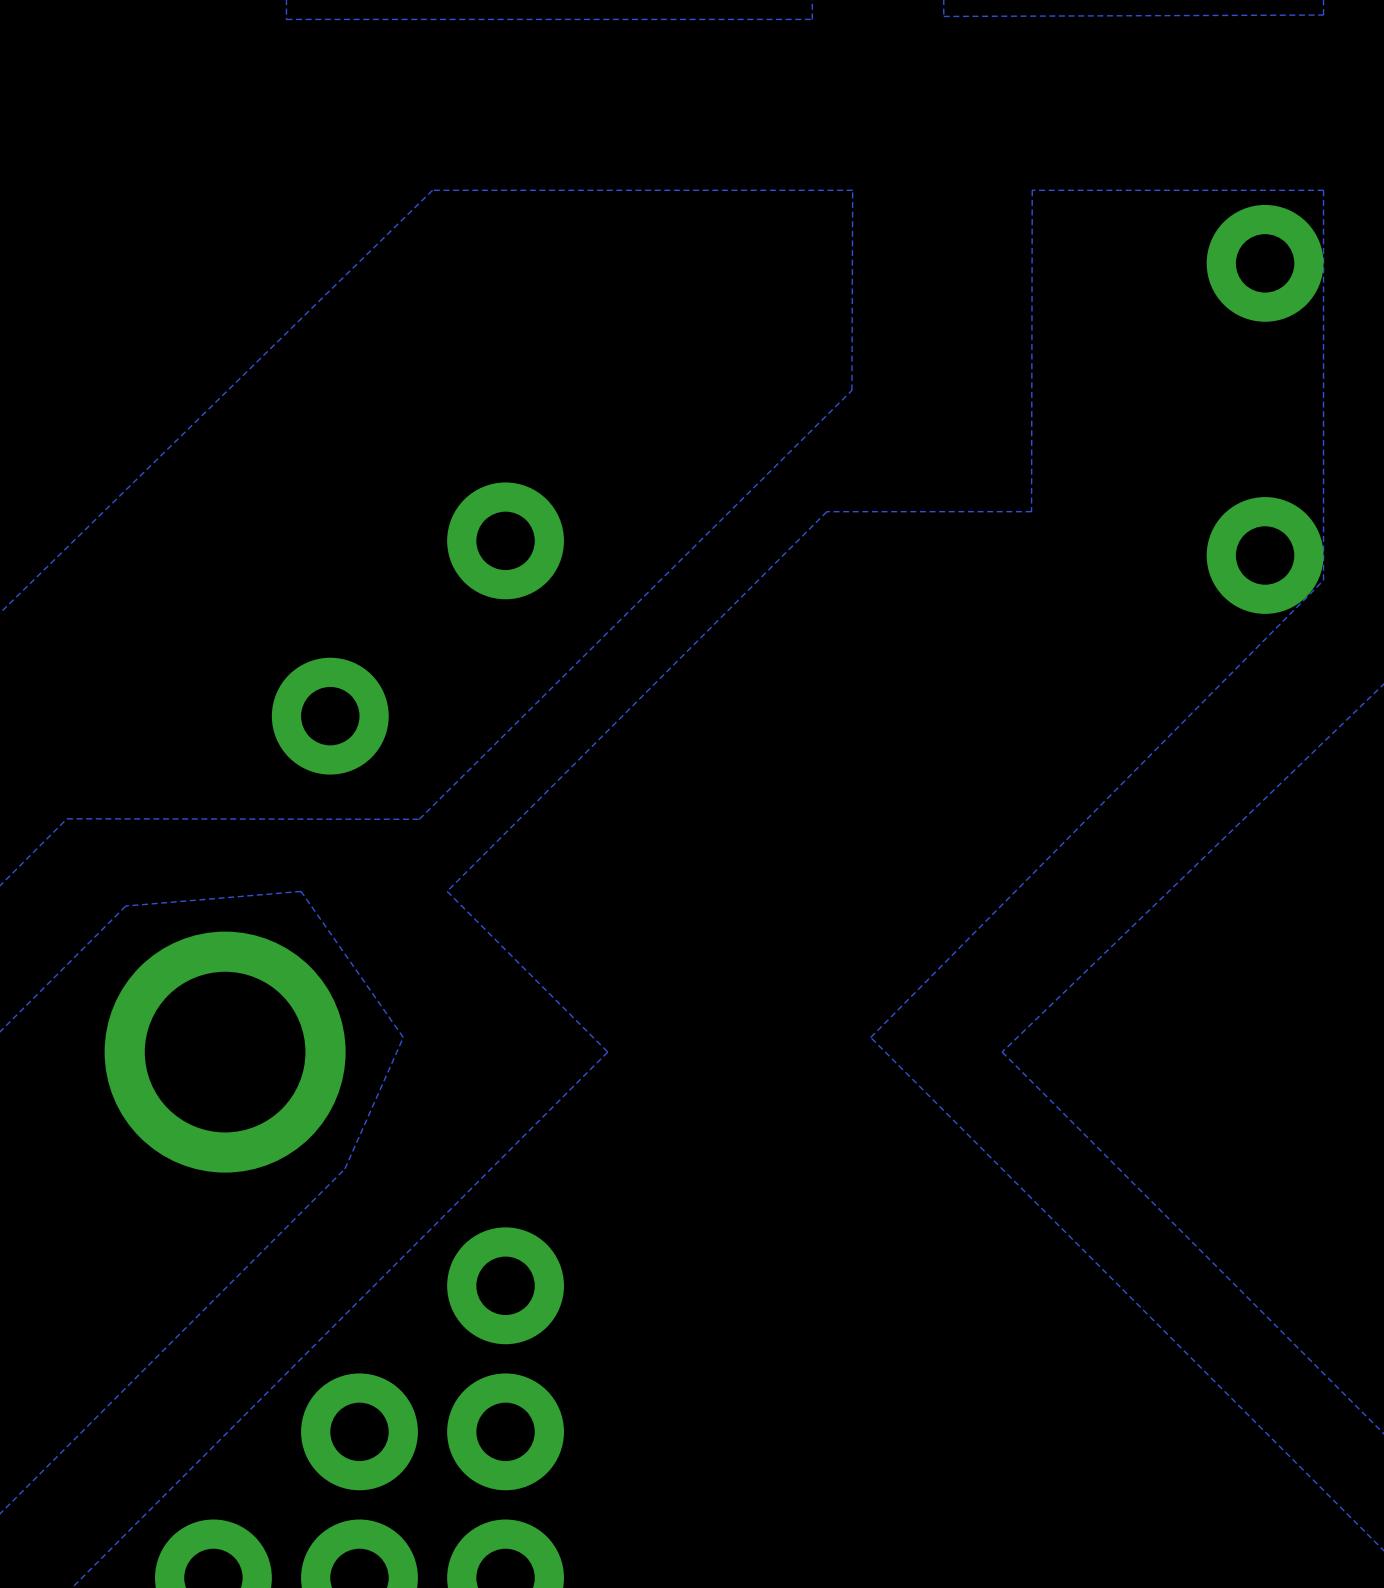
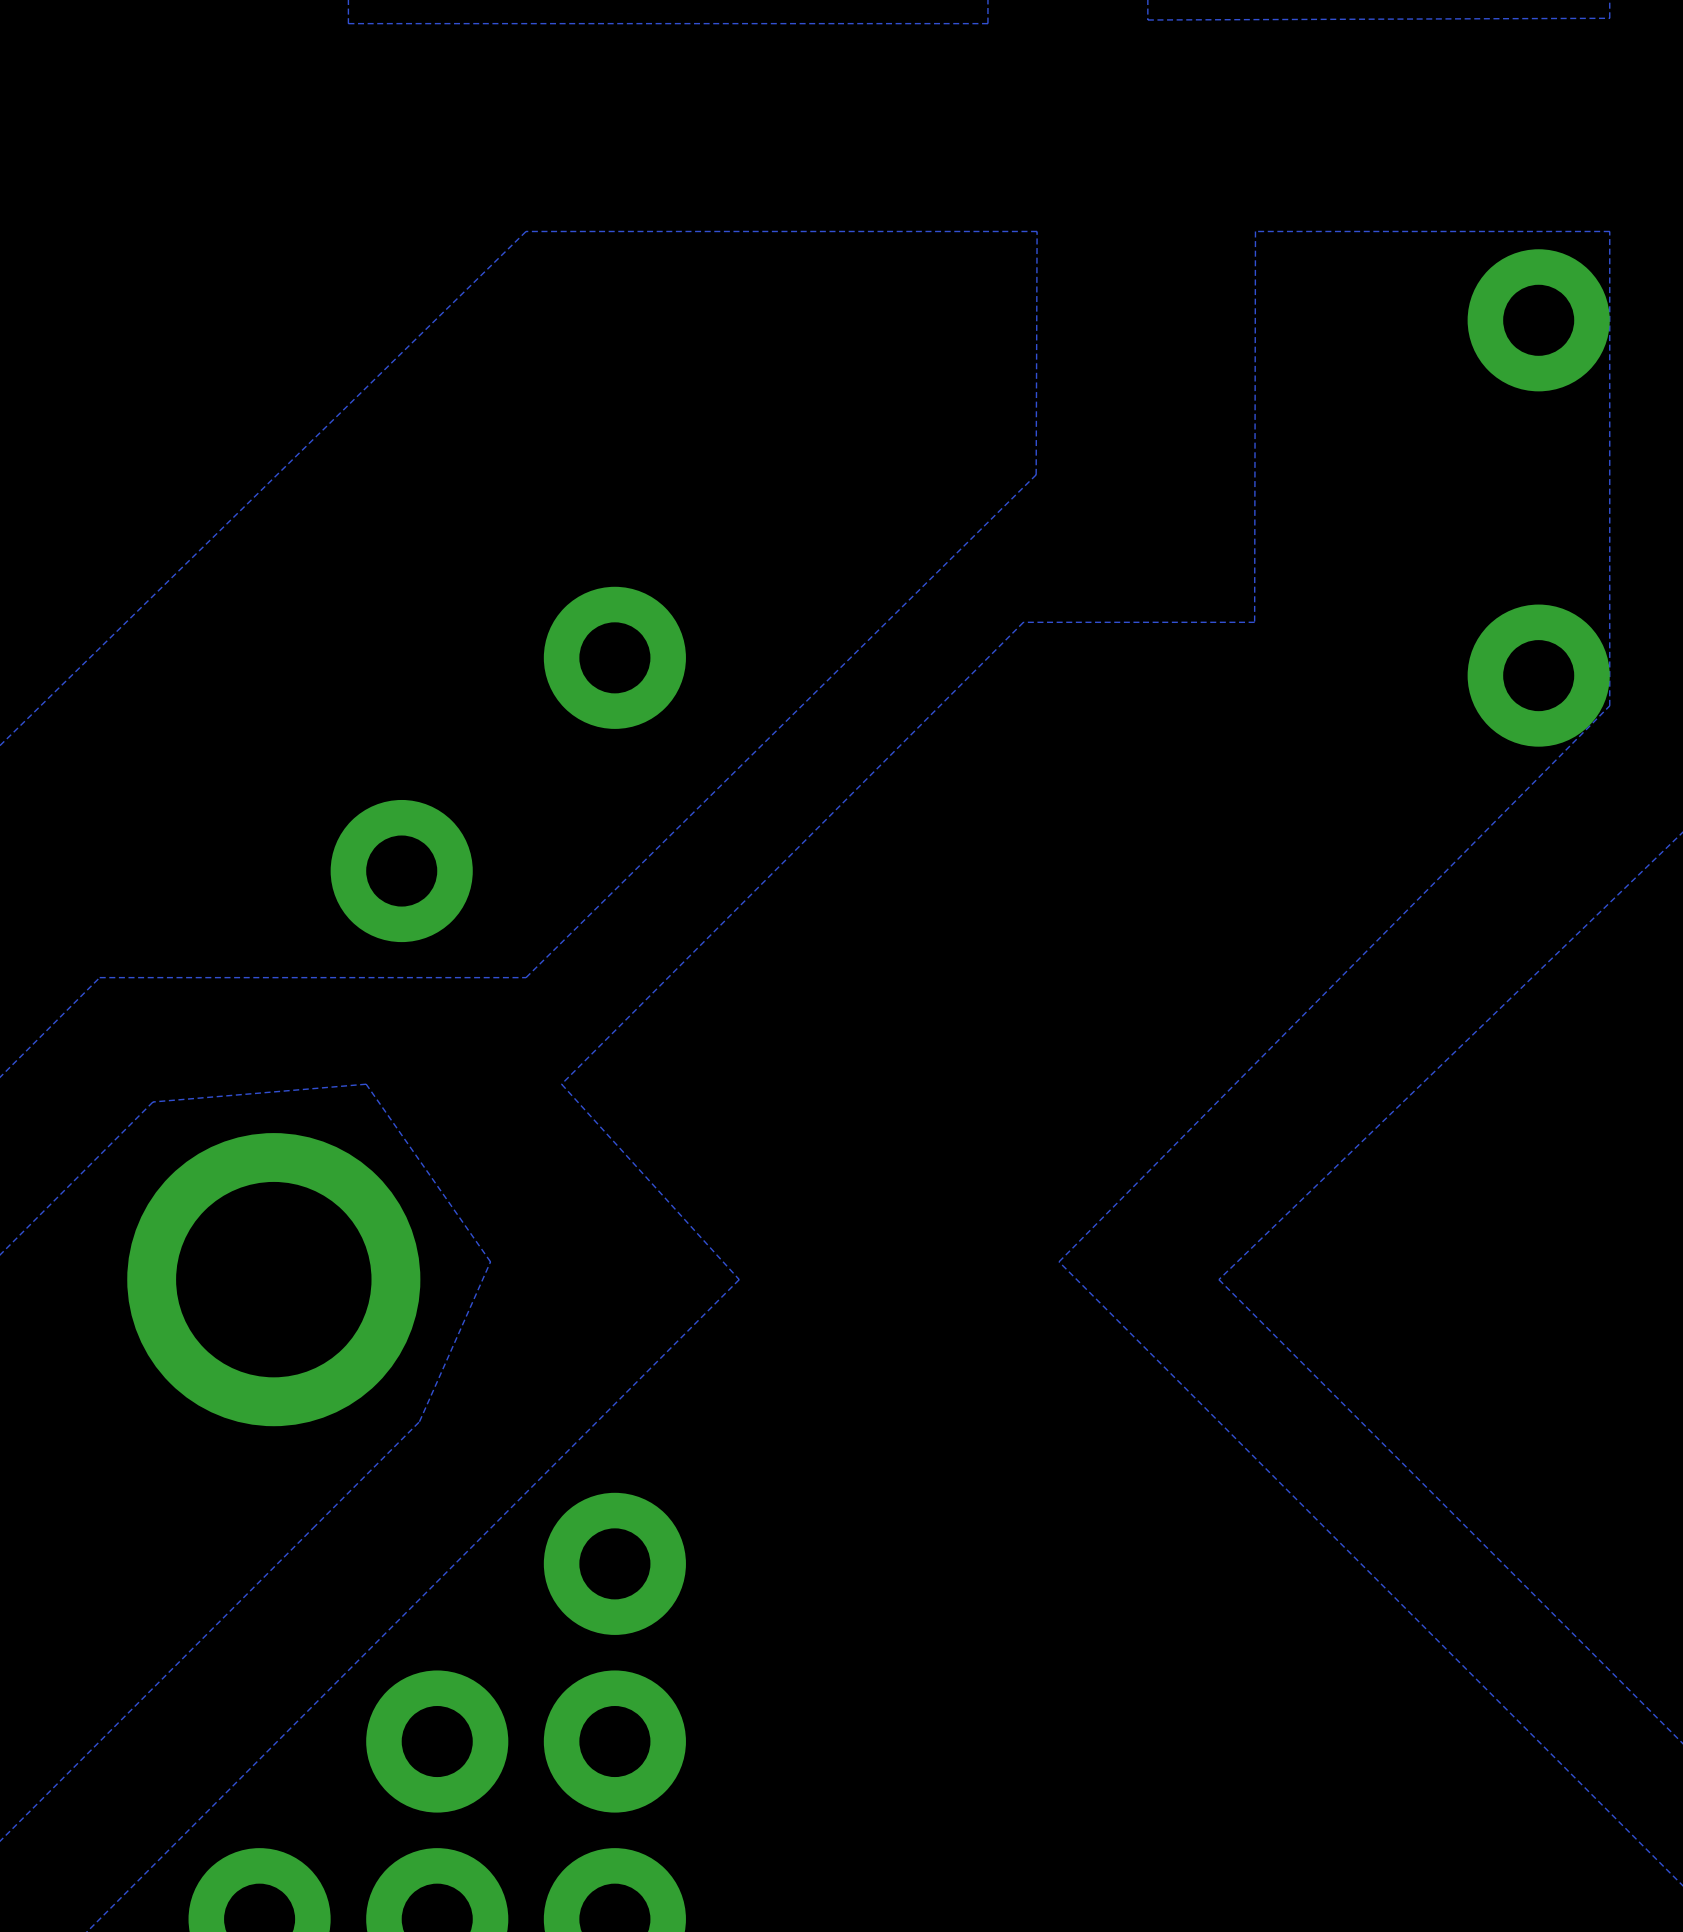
zone outline: (851, 390) (419, 819) (66, 818) -> (1036, 474) (526, 977) (99, 977) (81, 995)
zone outline: (841, 511) (826, 511) (447, 891) (607, 1052) -> (1023, 622) (561, 1084) (739, 1279)

